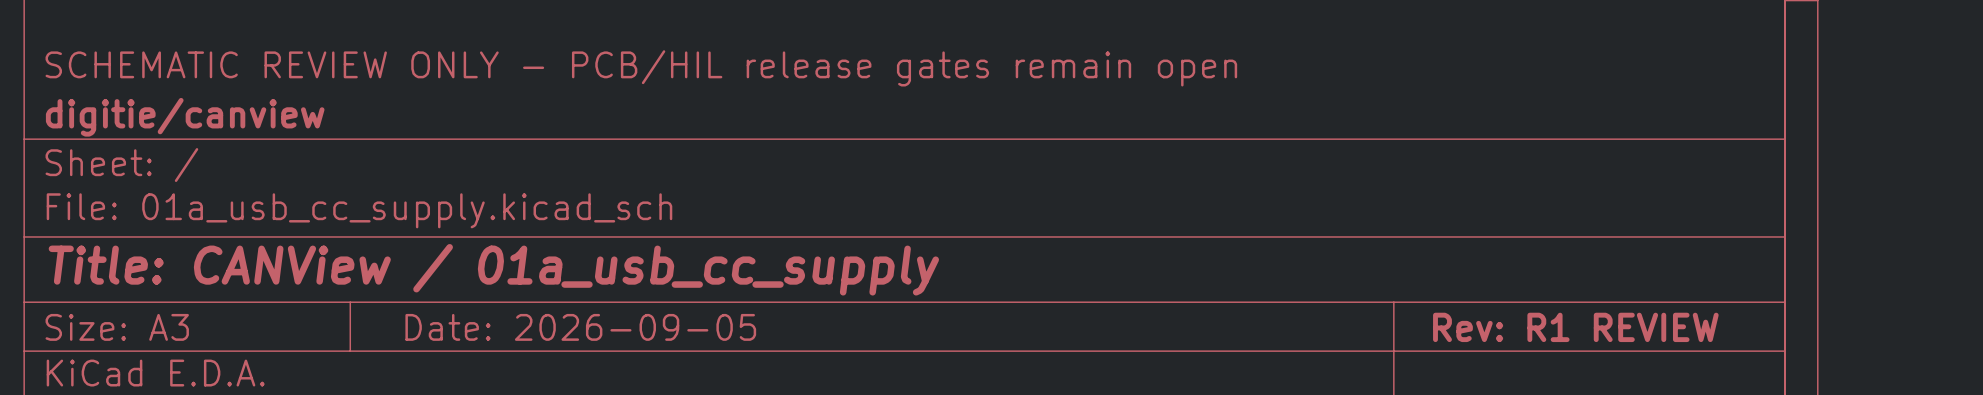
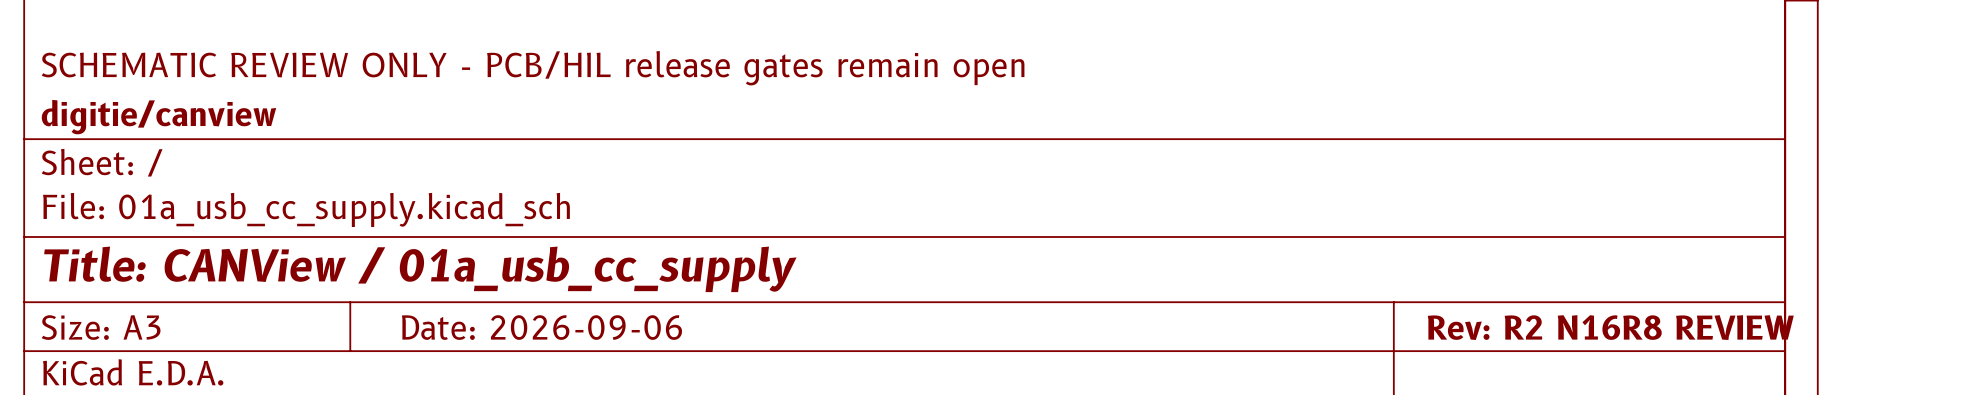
title block: Date: 2026-09-05 (580, 327) -> Date: 2026-09-06 (541, 327)
title block: Rev: R1 REVIEW (1575, 327) -> Rev: R2 N16R8 REVIEW (1610, 327)

